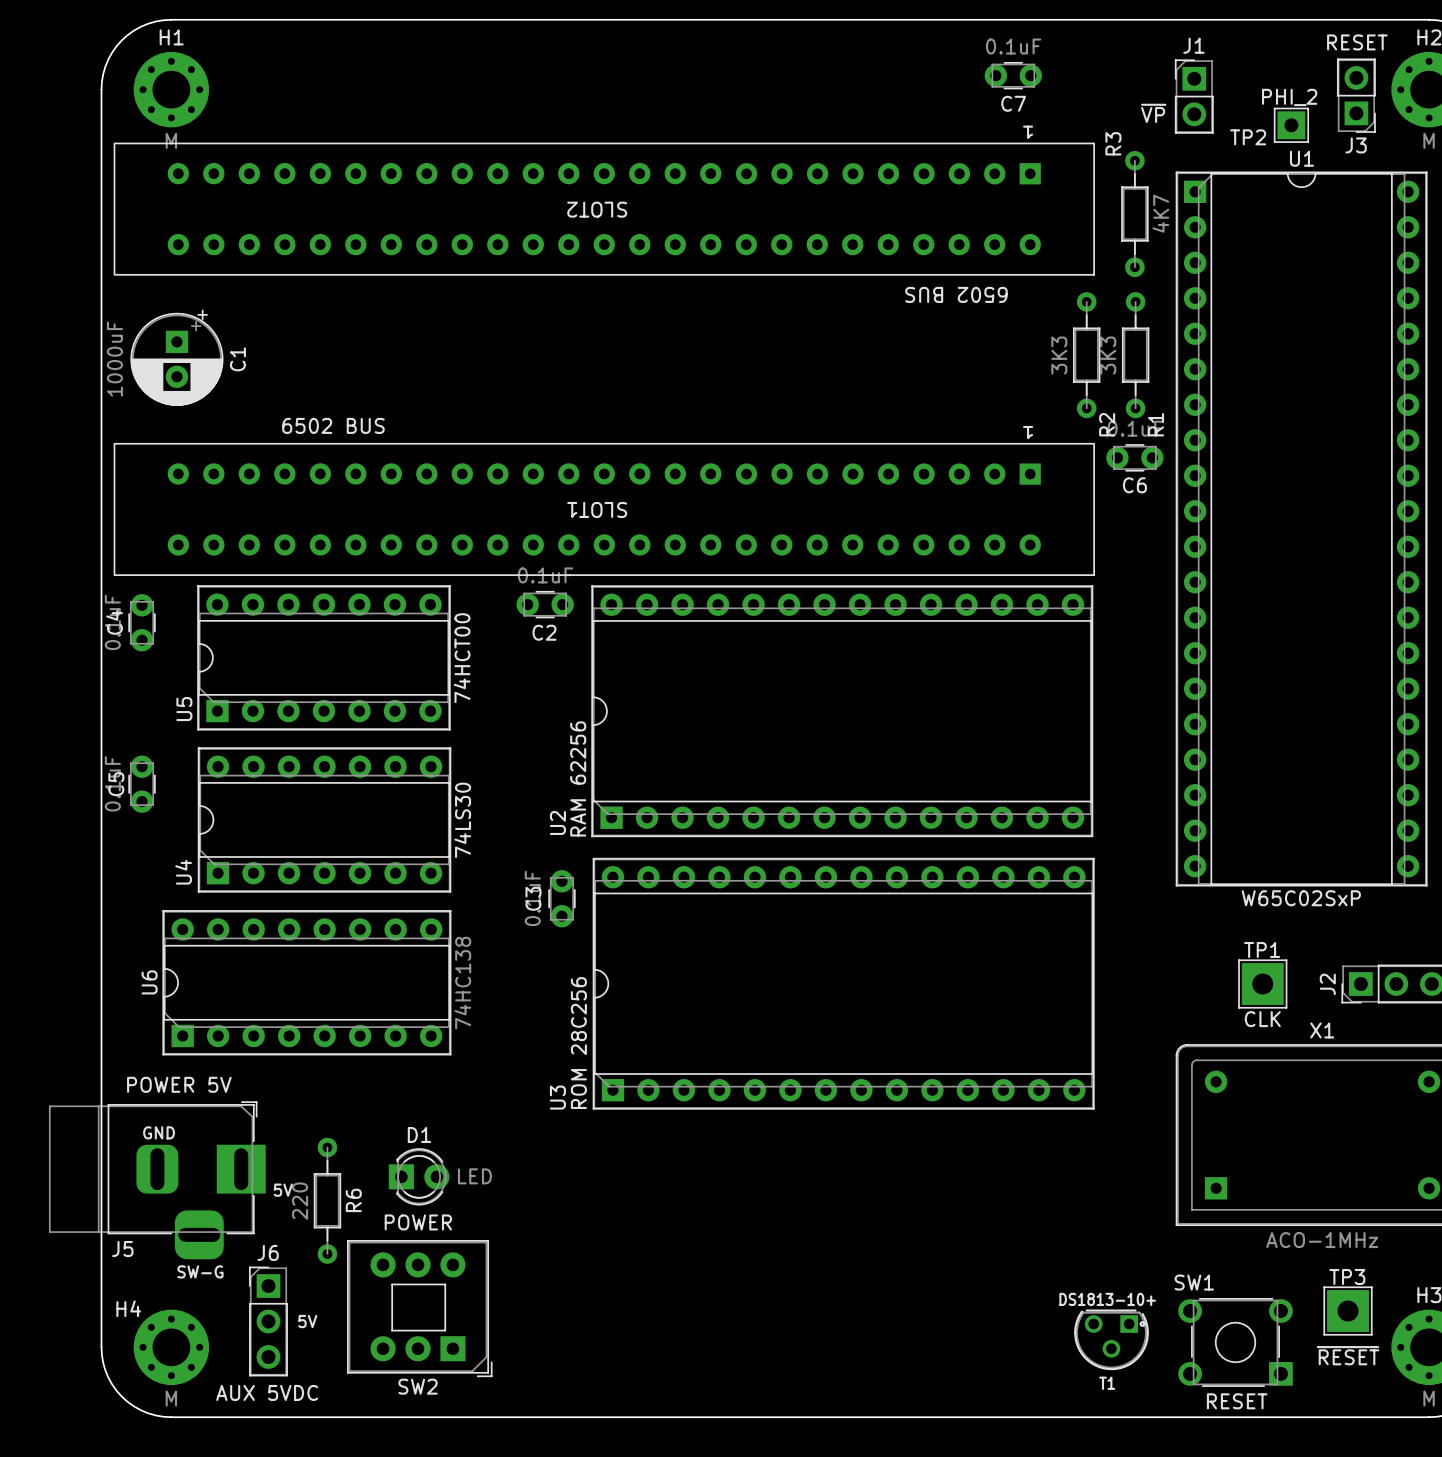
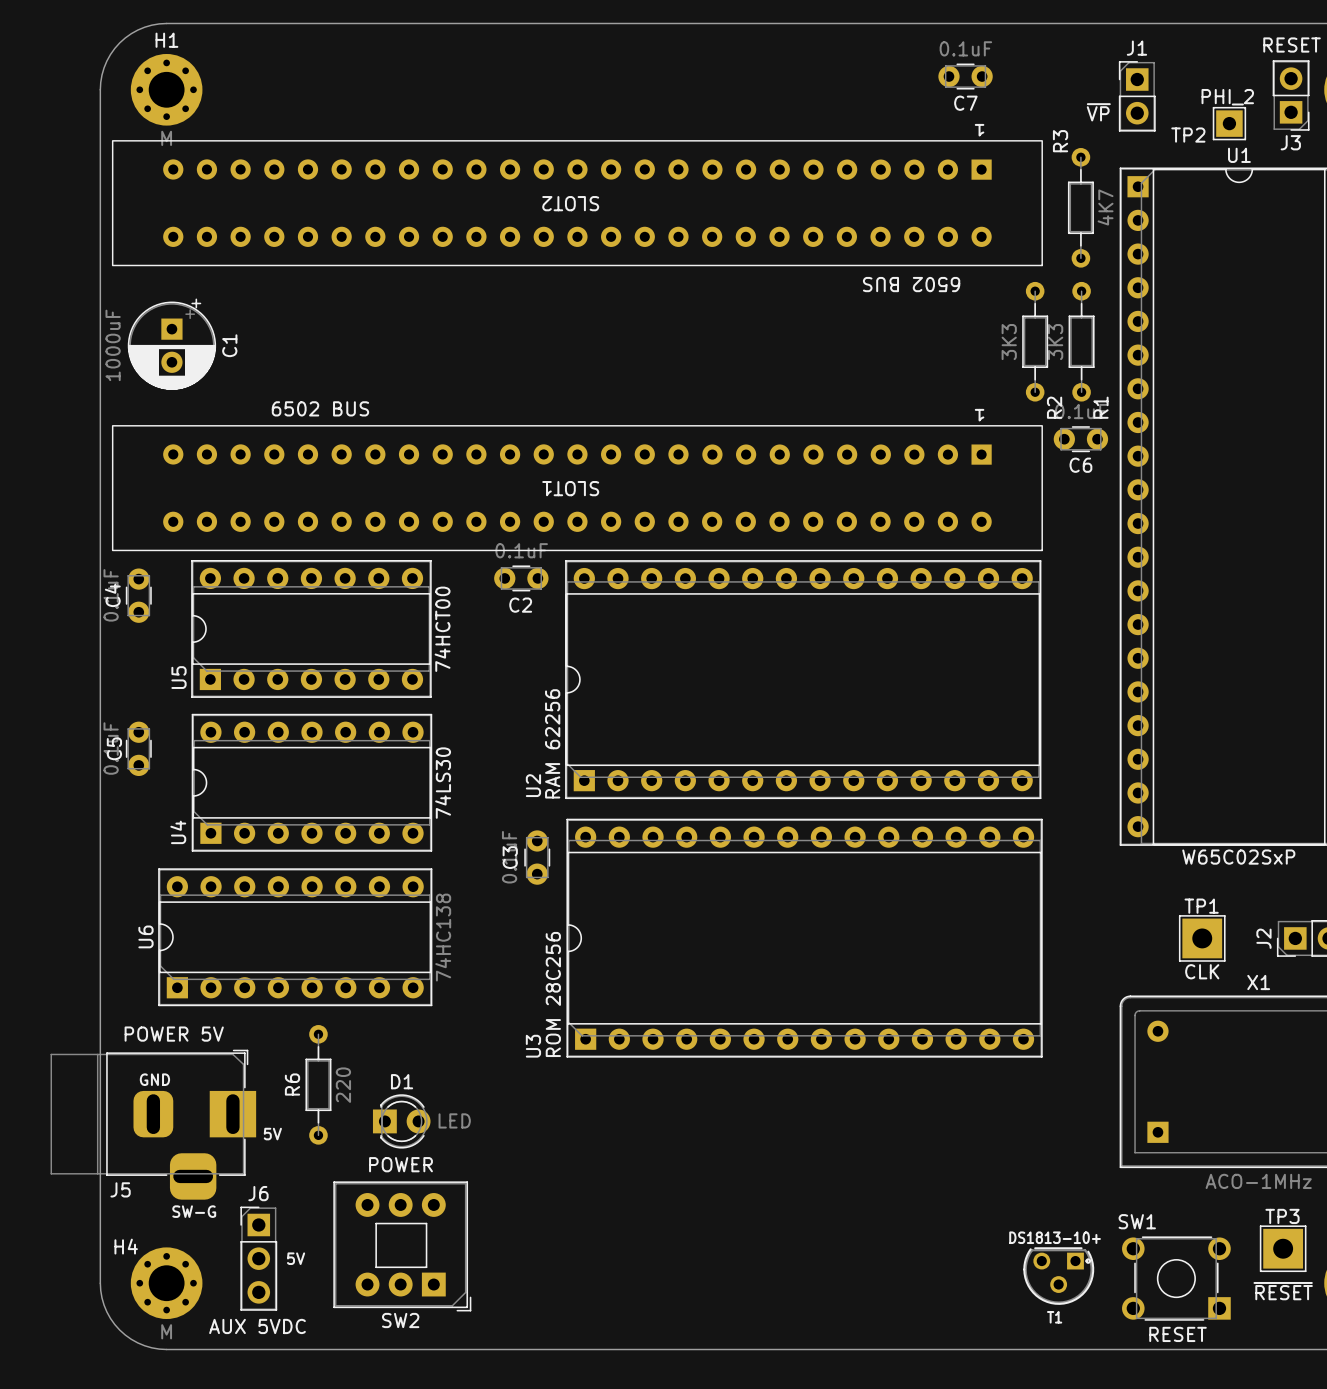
R6 position: (327, 1200) -> (318, 1084)
R6 name position: R6 (353, 1200) -> R6 (292, 1084)
R6 value position: 220 (300, 1201) -> 220 (343, 1085)

